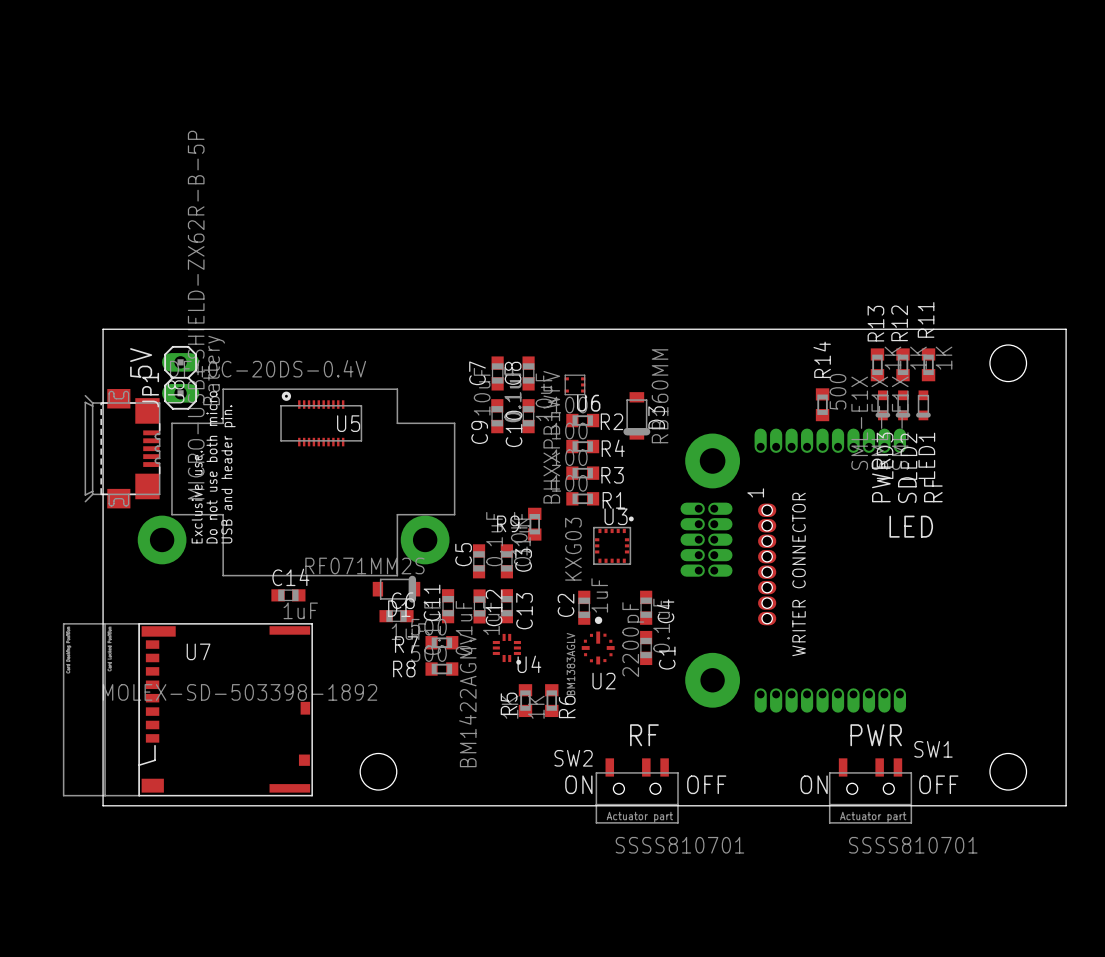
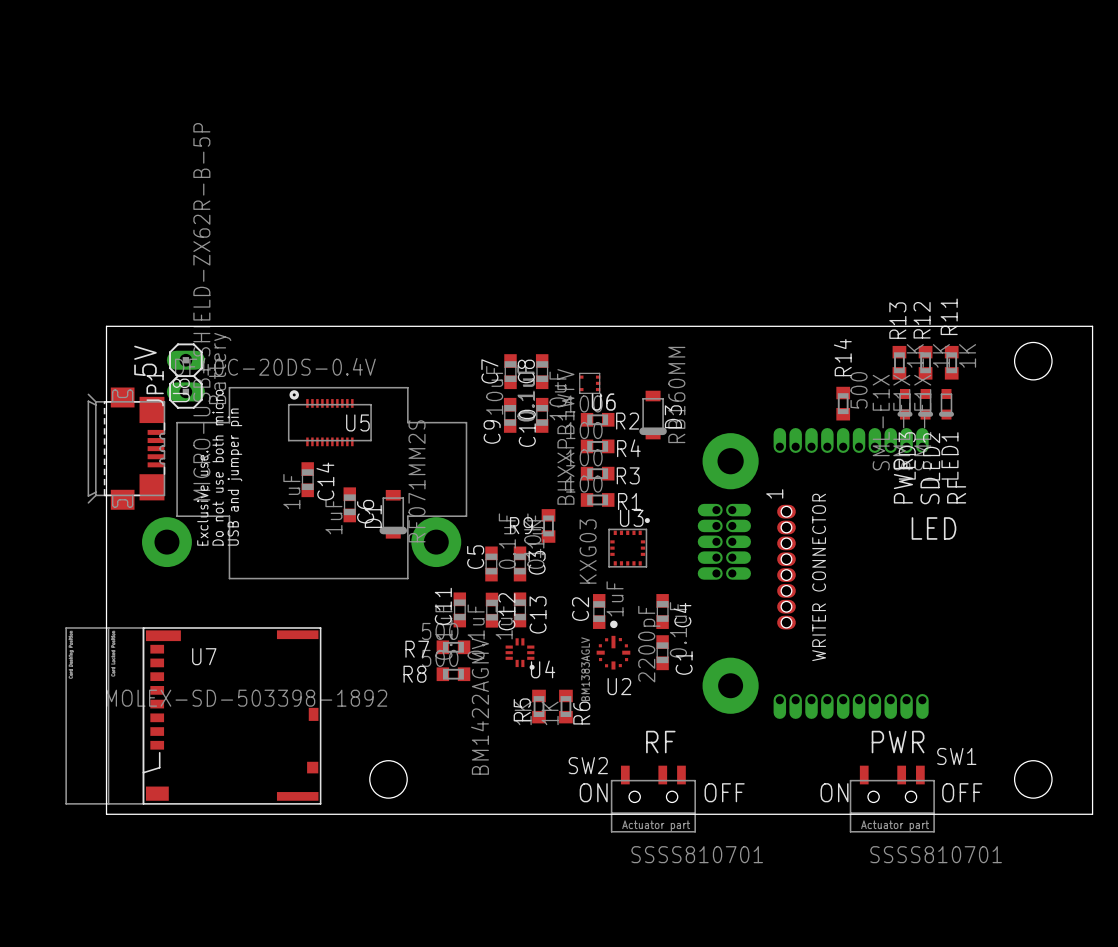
text: USB and header pin. (228, 474) -> USB and jumper pin (234, 477)
D1 rotation: 0° (396, 589) -> 90° clockwise (393, 514)
D1 position: (396, 589) -> (393, 514)
C14 rotation: 0° (288, 595) -> 90° clockwise (307, 479)
C14 position: (288, 595) -> (307, 479)
C6 rotation: 0° (396, 616) -> 90° clockwise (349, 504)
C6 position: (396, 616) -> (349, 504)

